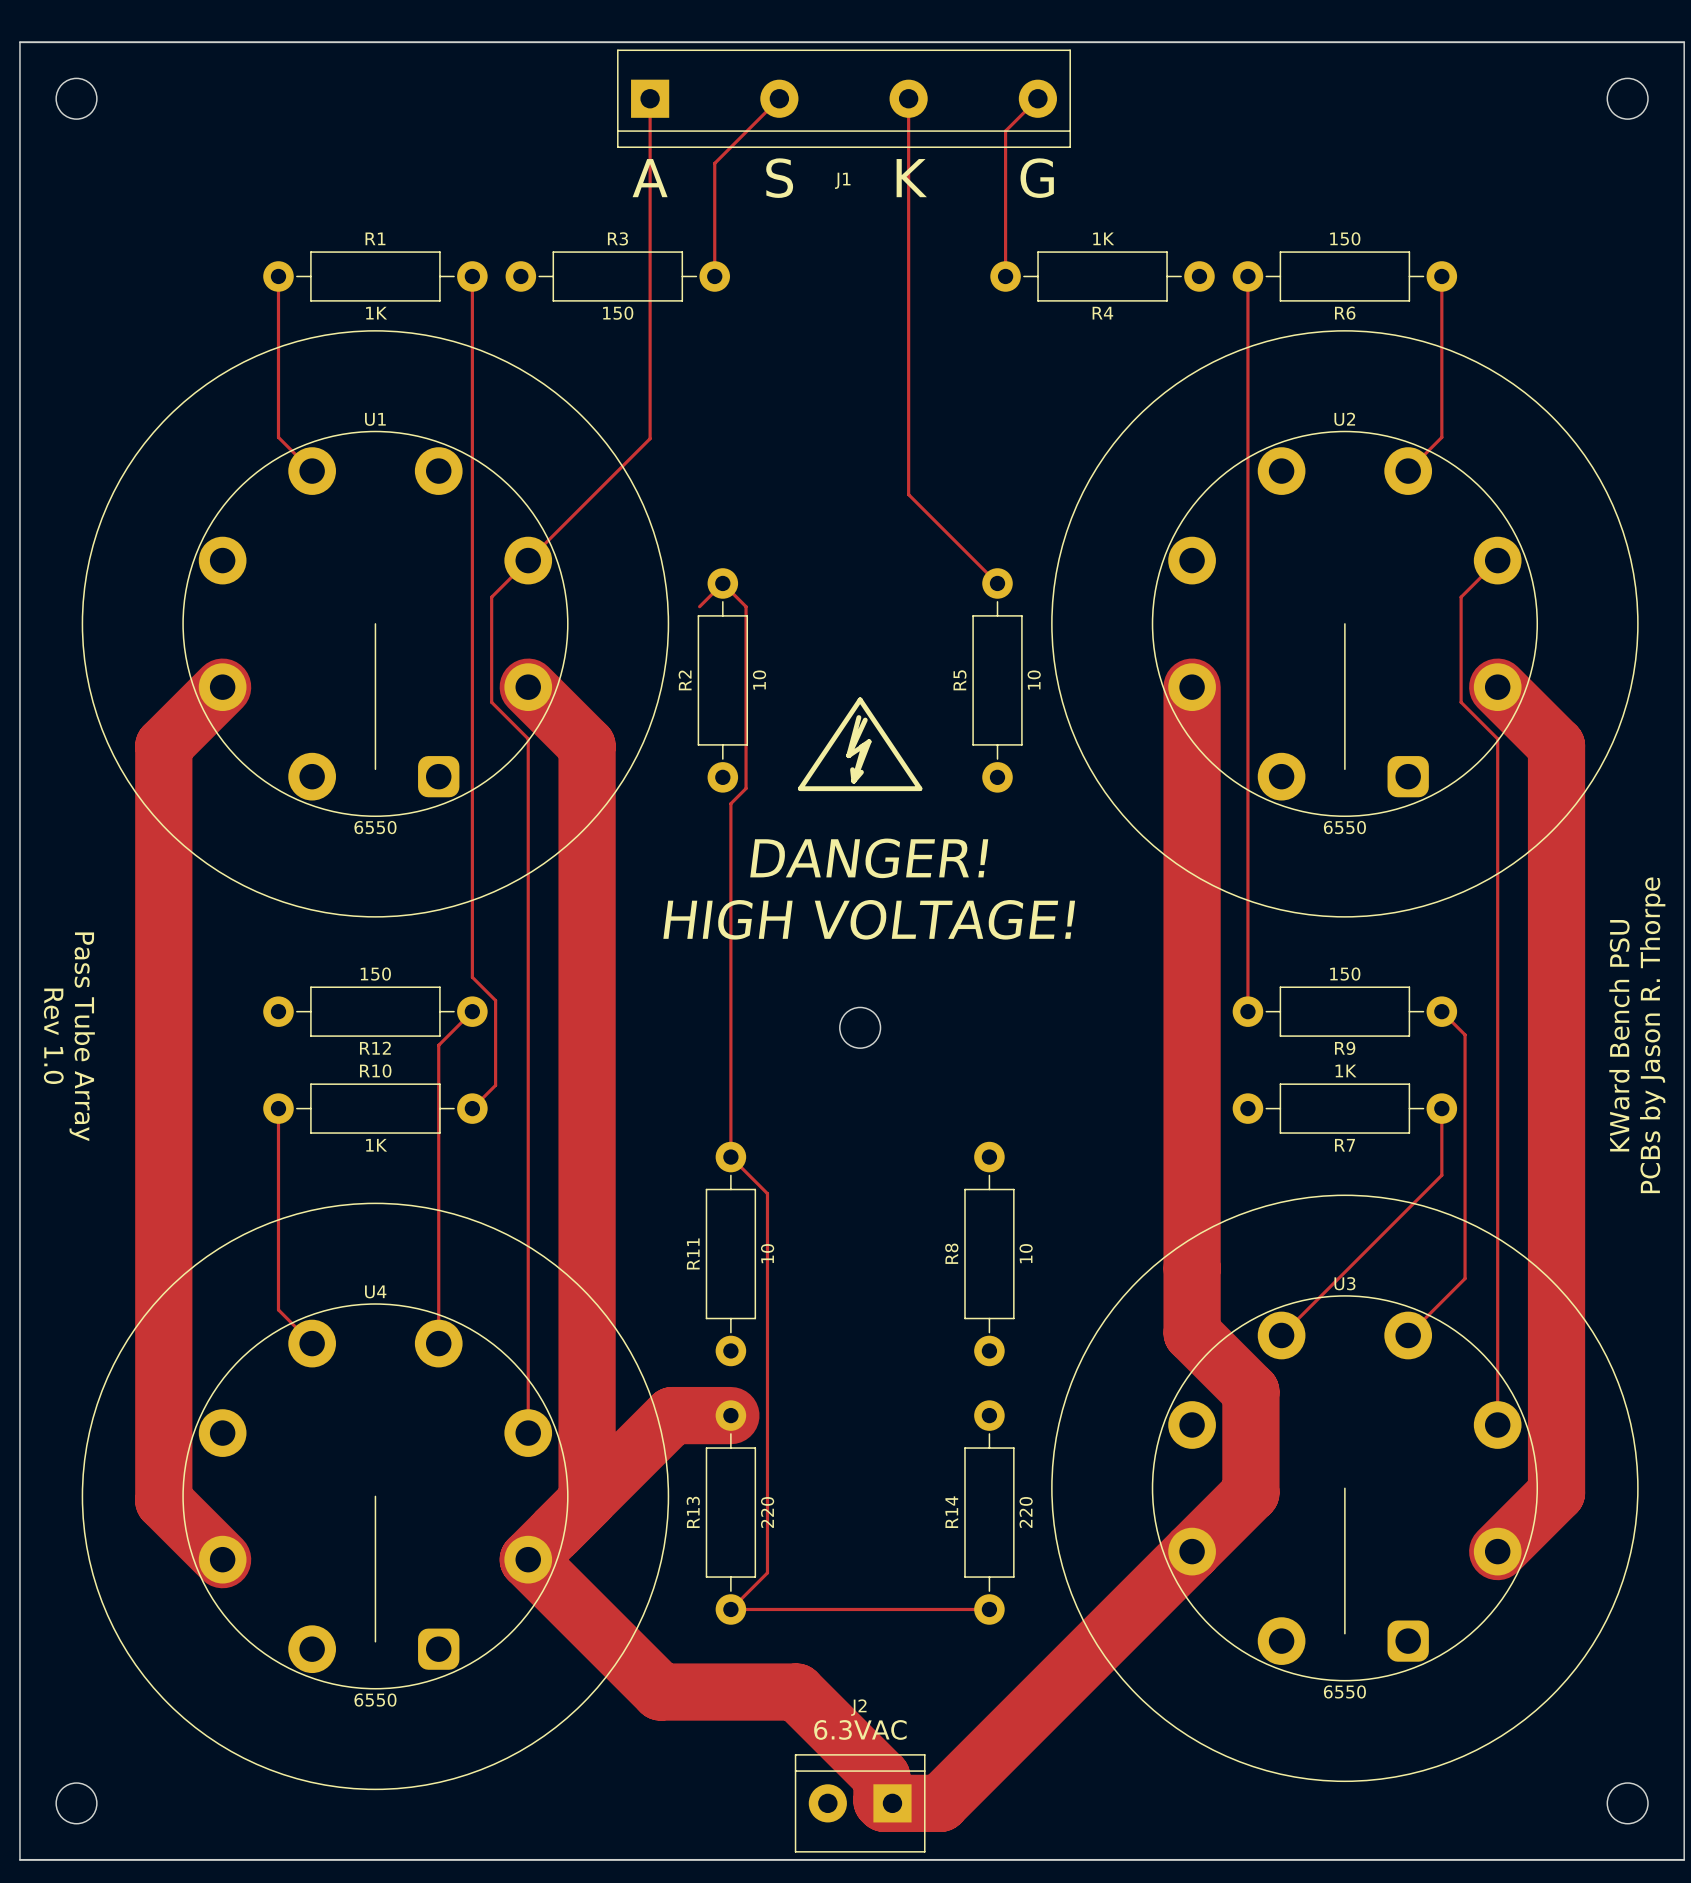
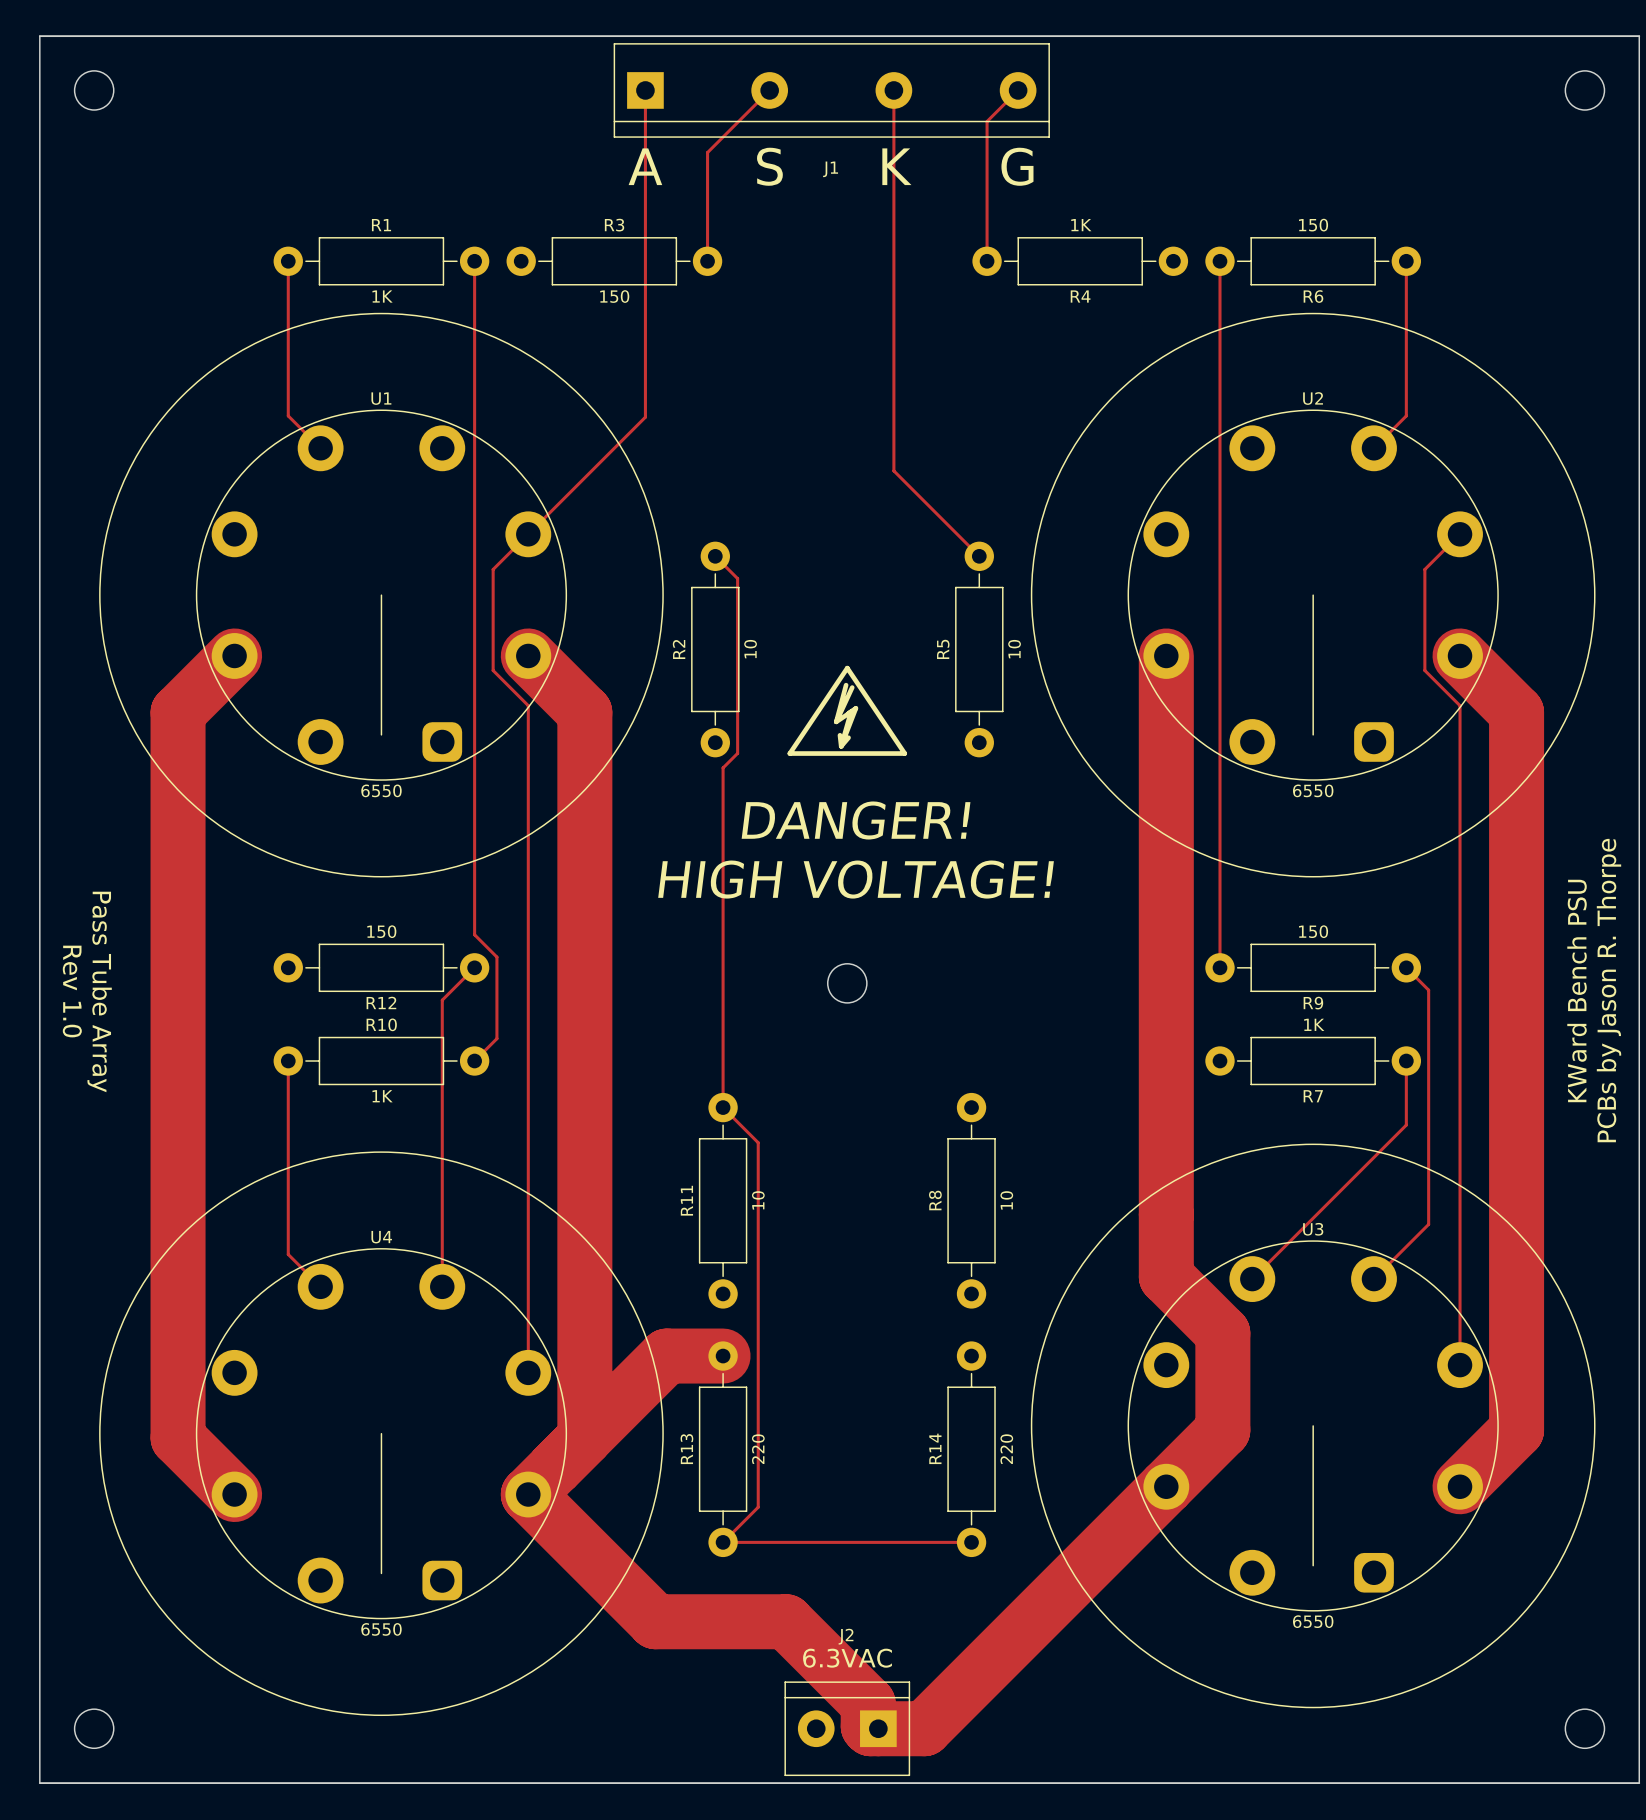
track: (722, 583) (699, 606) -> none

